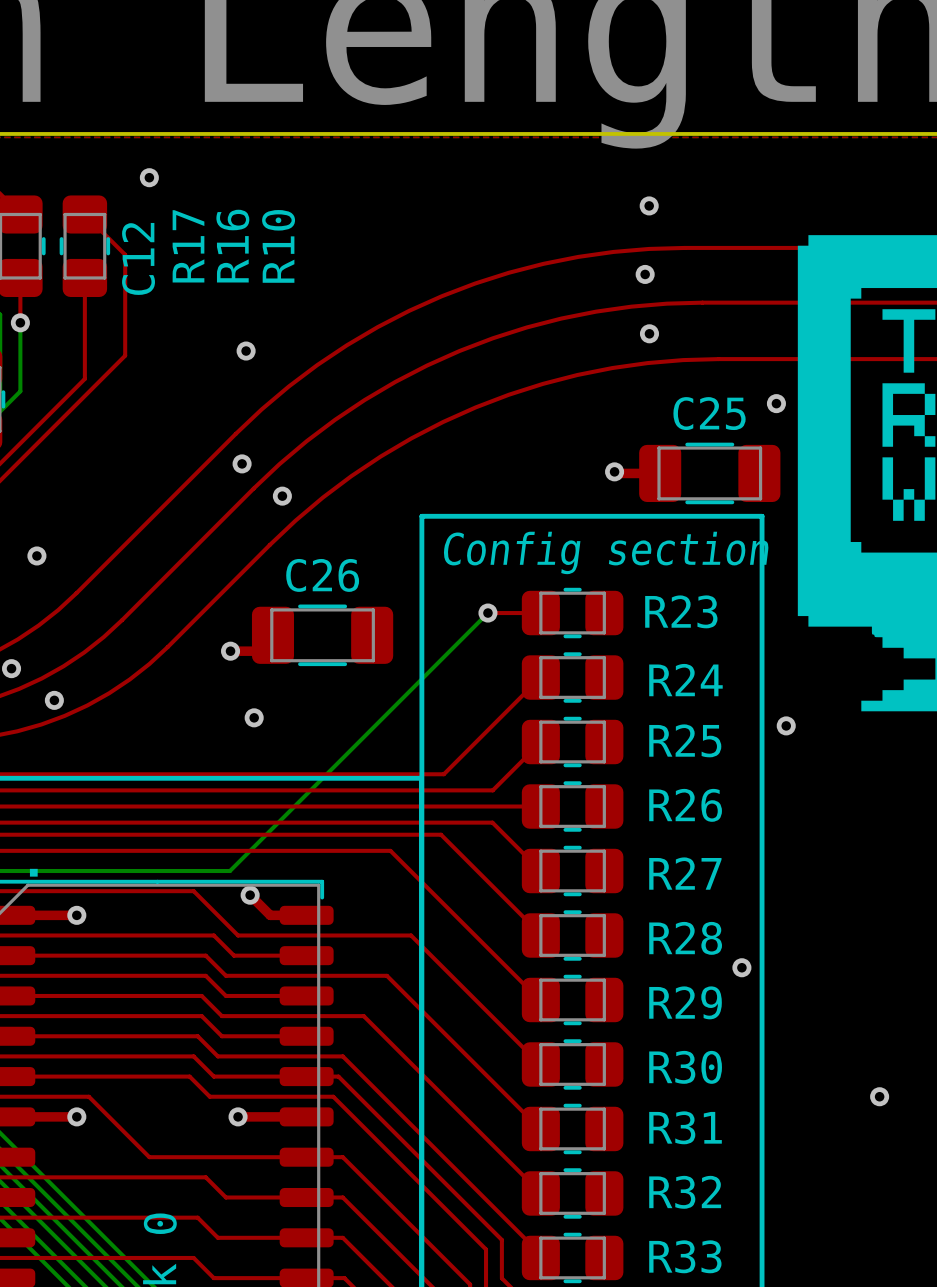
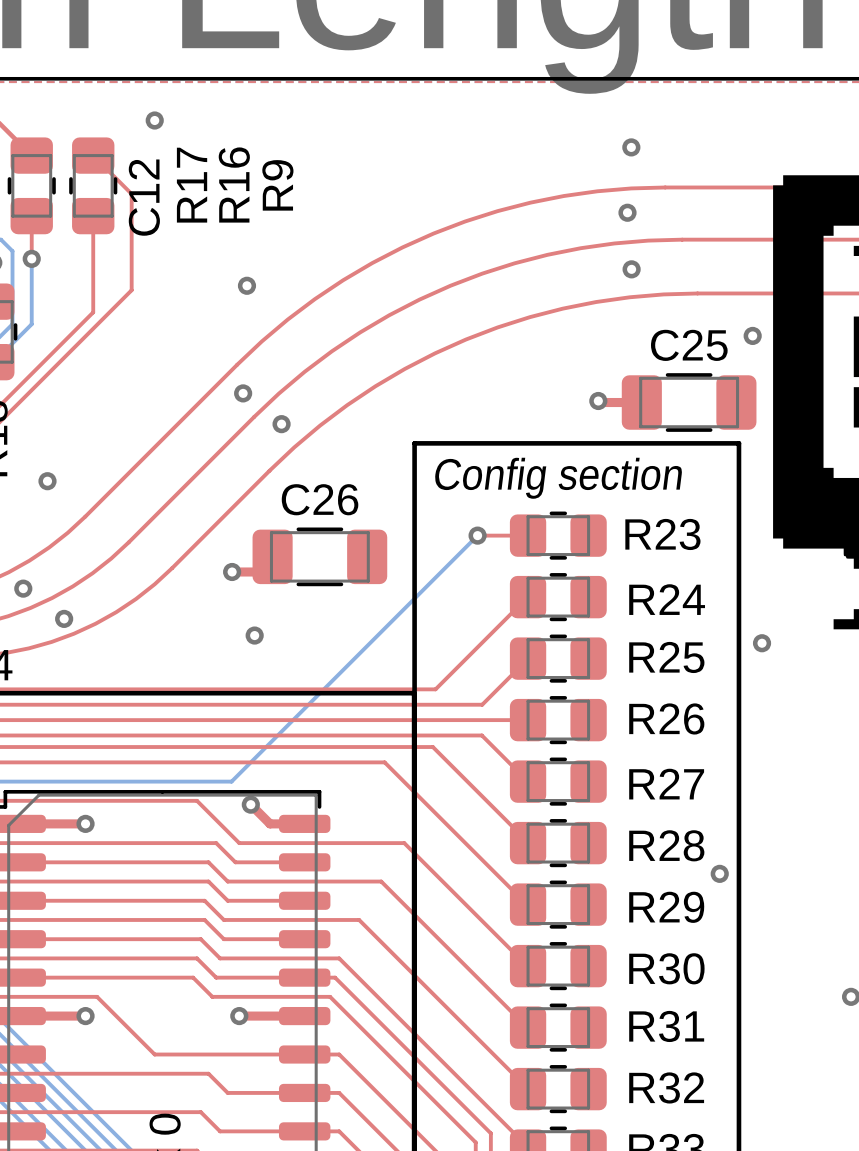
R10 name: R10 (278, 246) -> R9 (277, 185)

